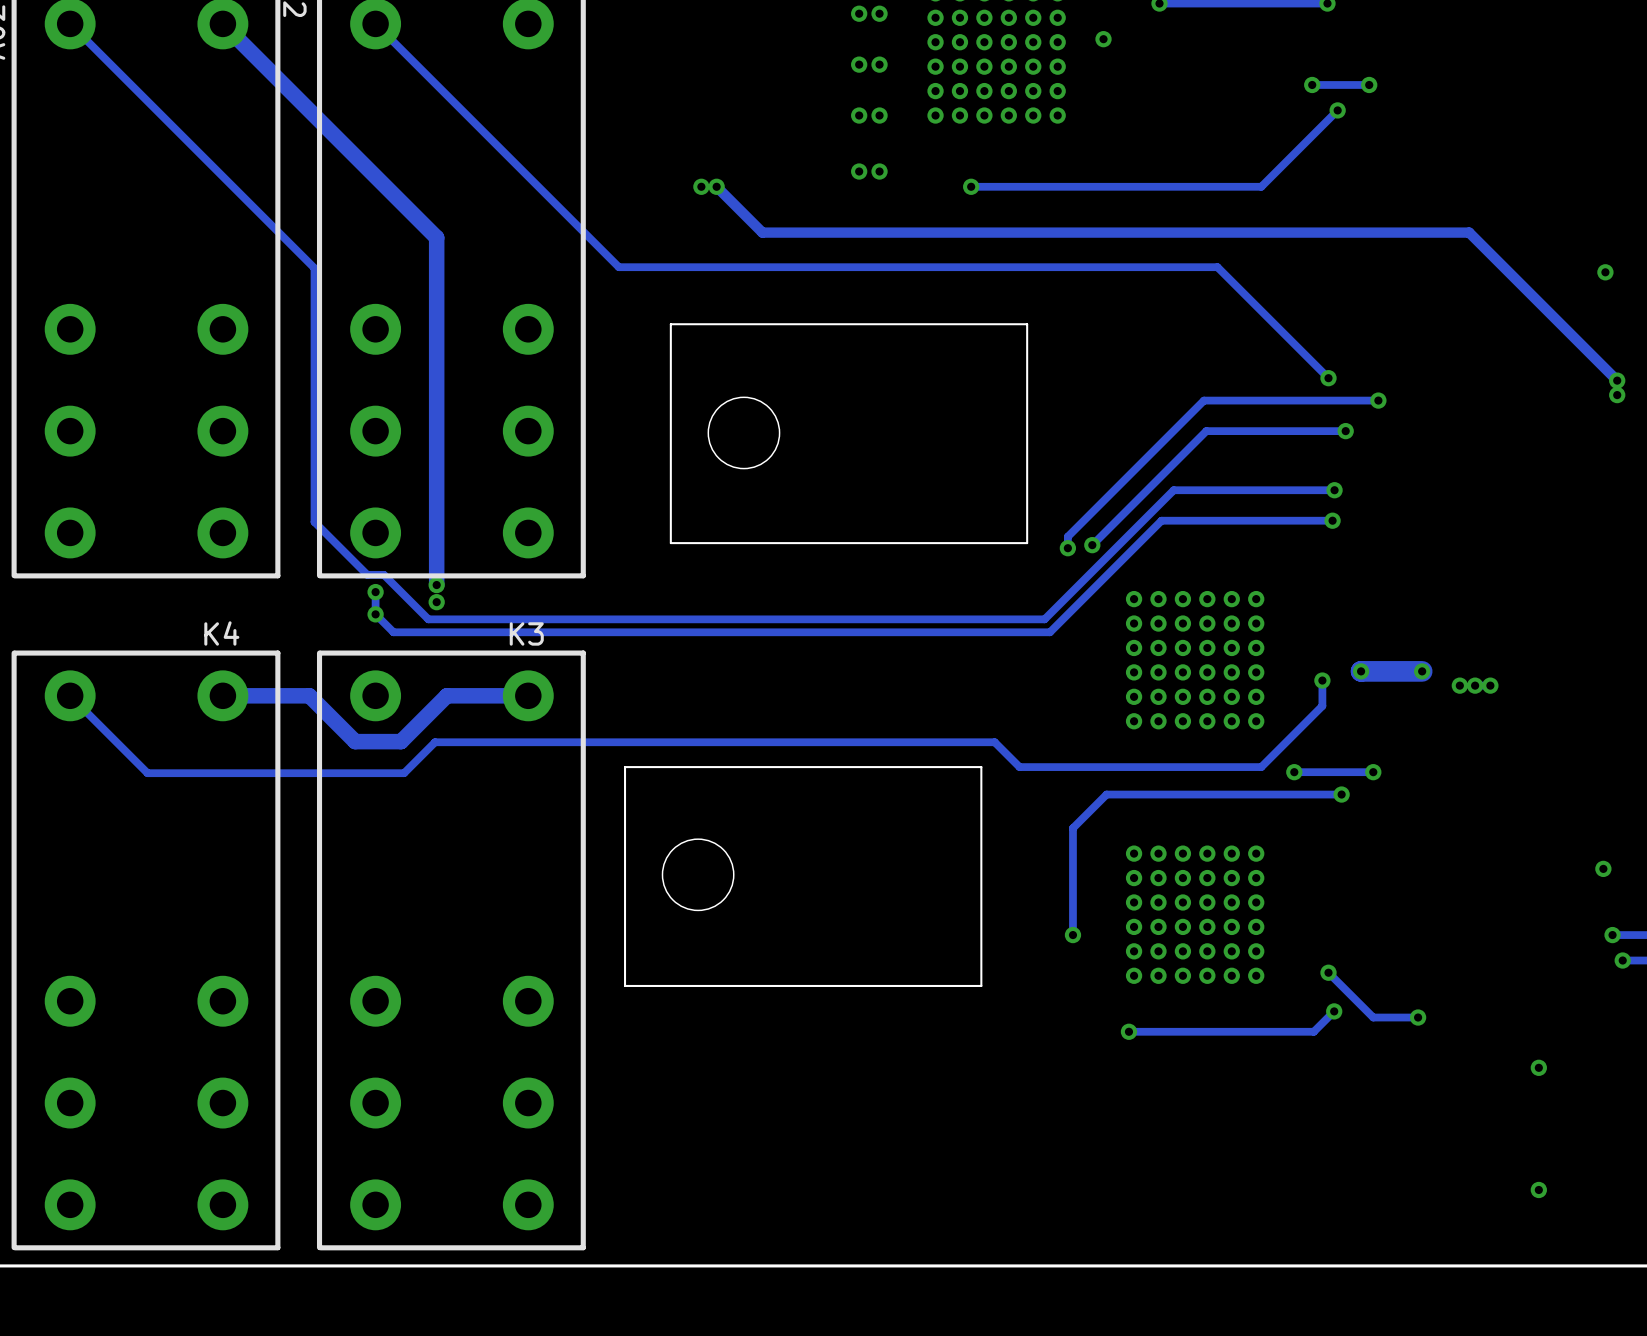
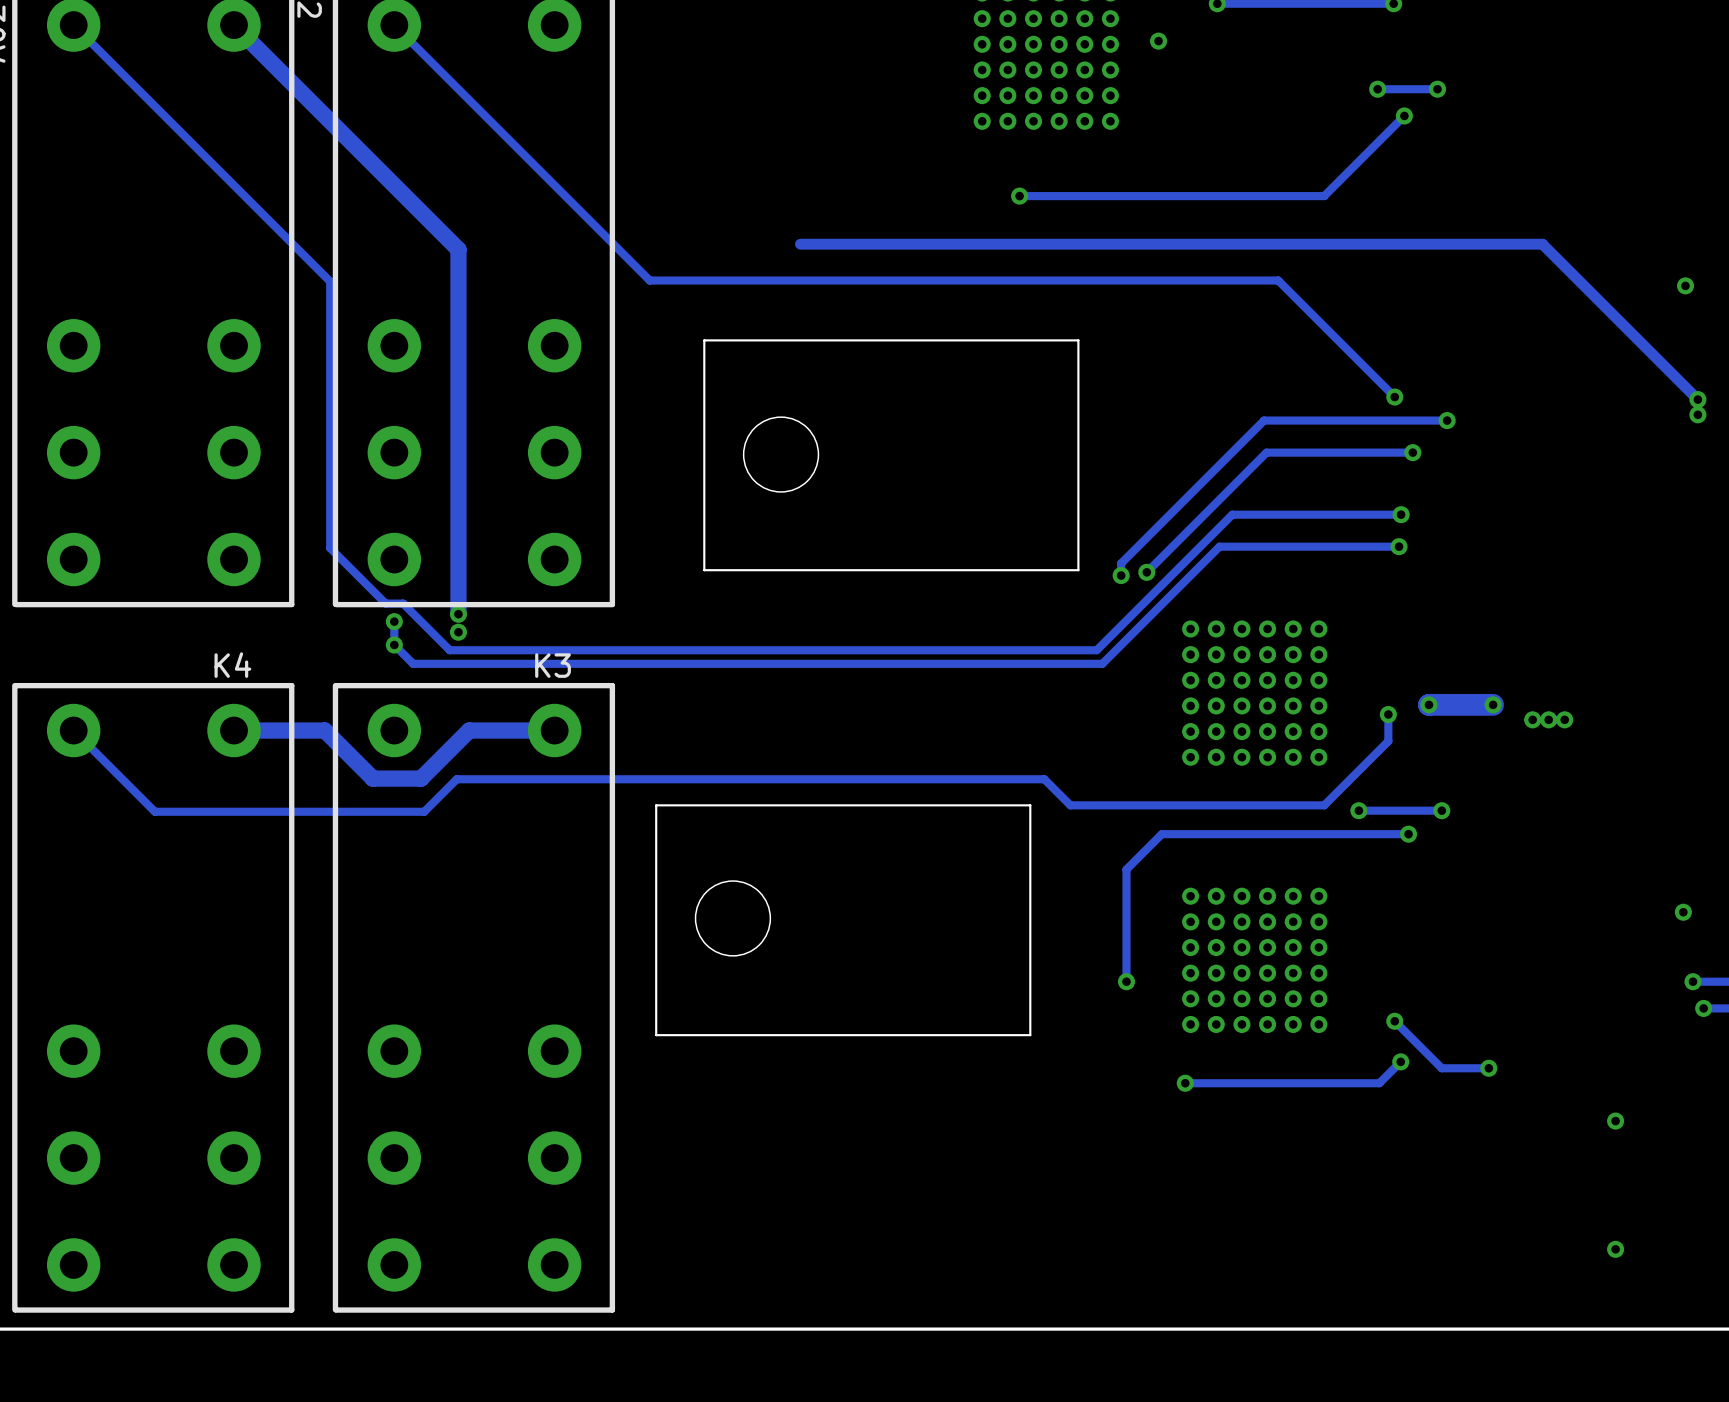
via: (859, 13) -> none
via: (879, 13) -> none
via: (859, 64) -> none
via: (879, 64) -> none
via: (859, 115) -> none
via: (879, 115) -> none
via: (859, 171) -> none
via: (879, 171) -> none
via: (701, 186) -> none
track: (716, 186) (762, 232) -> none
via: (716, 186) -> none

